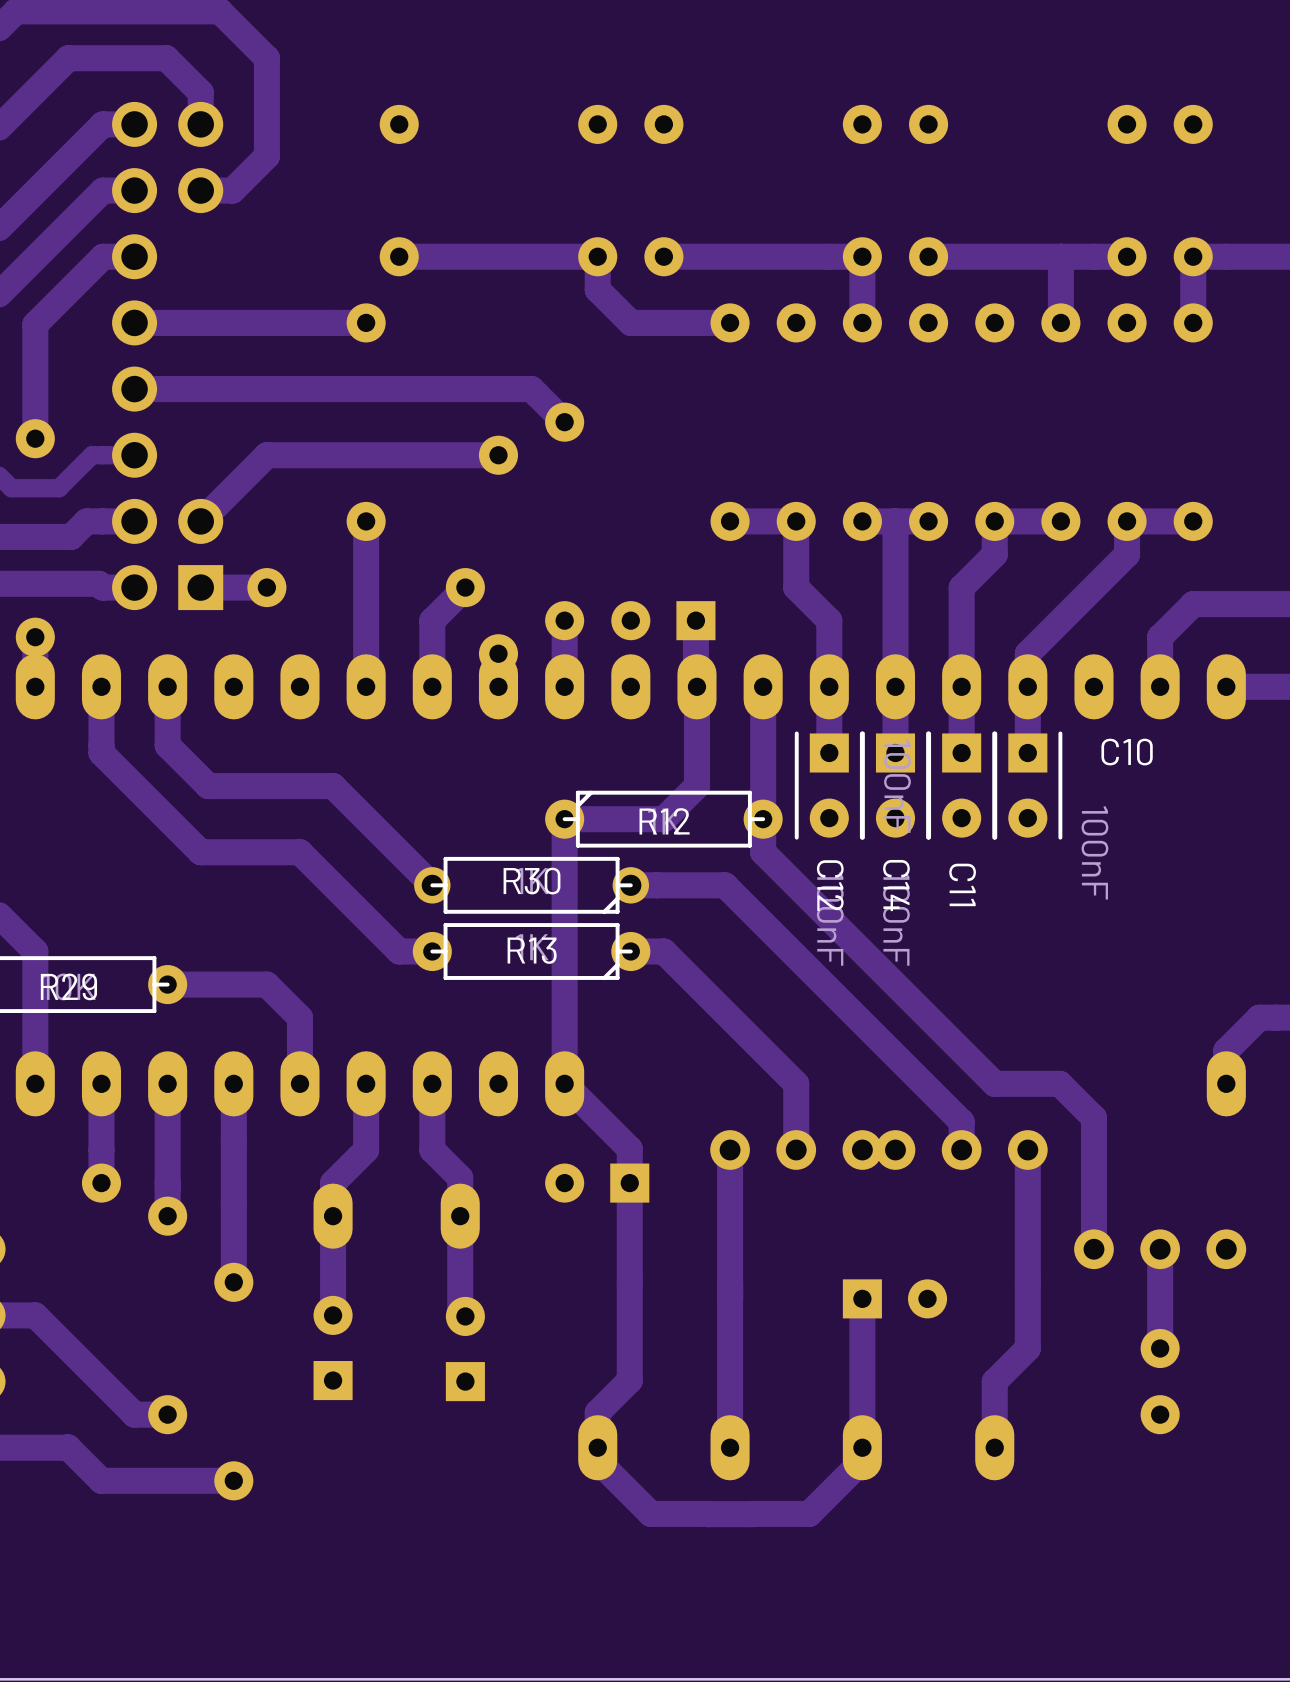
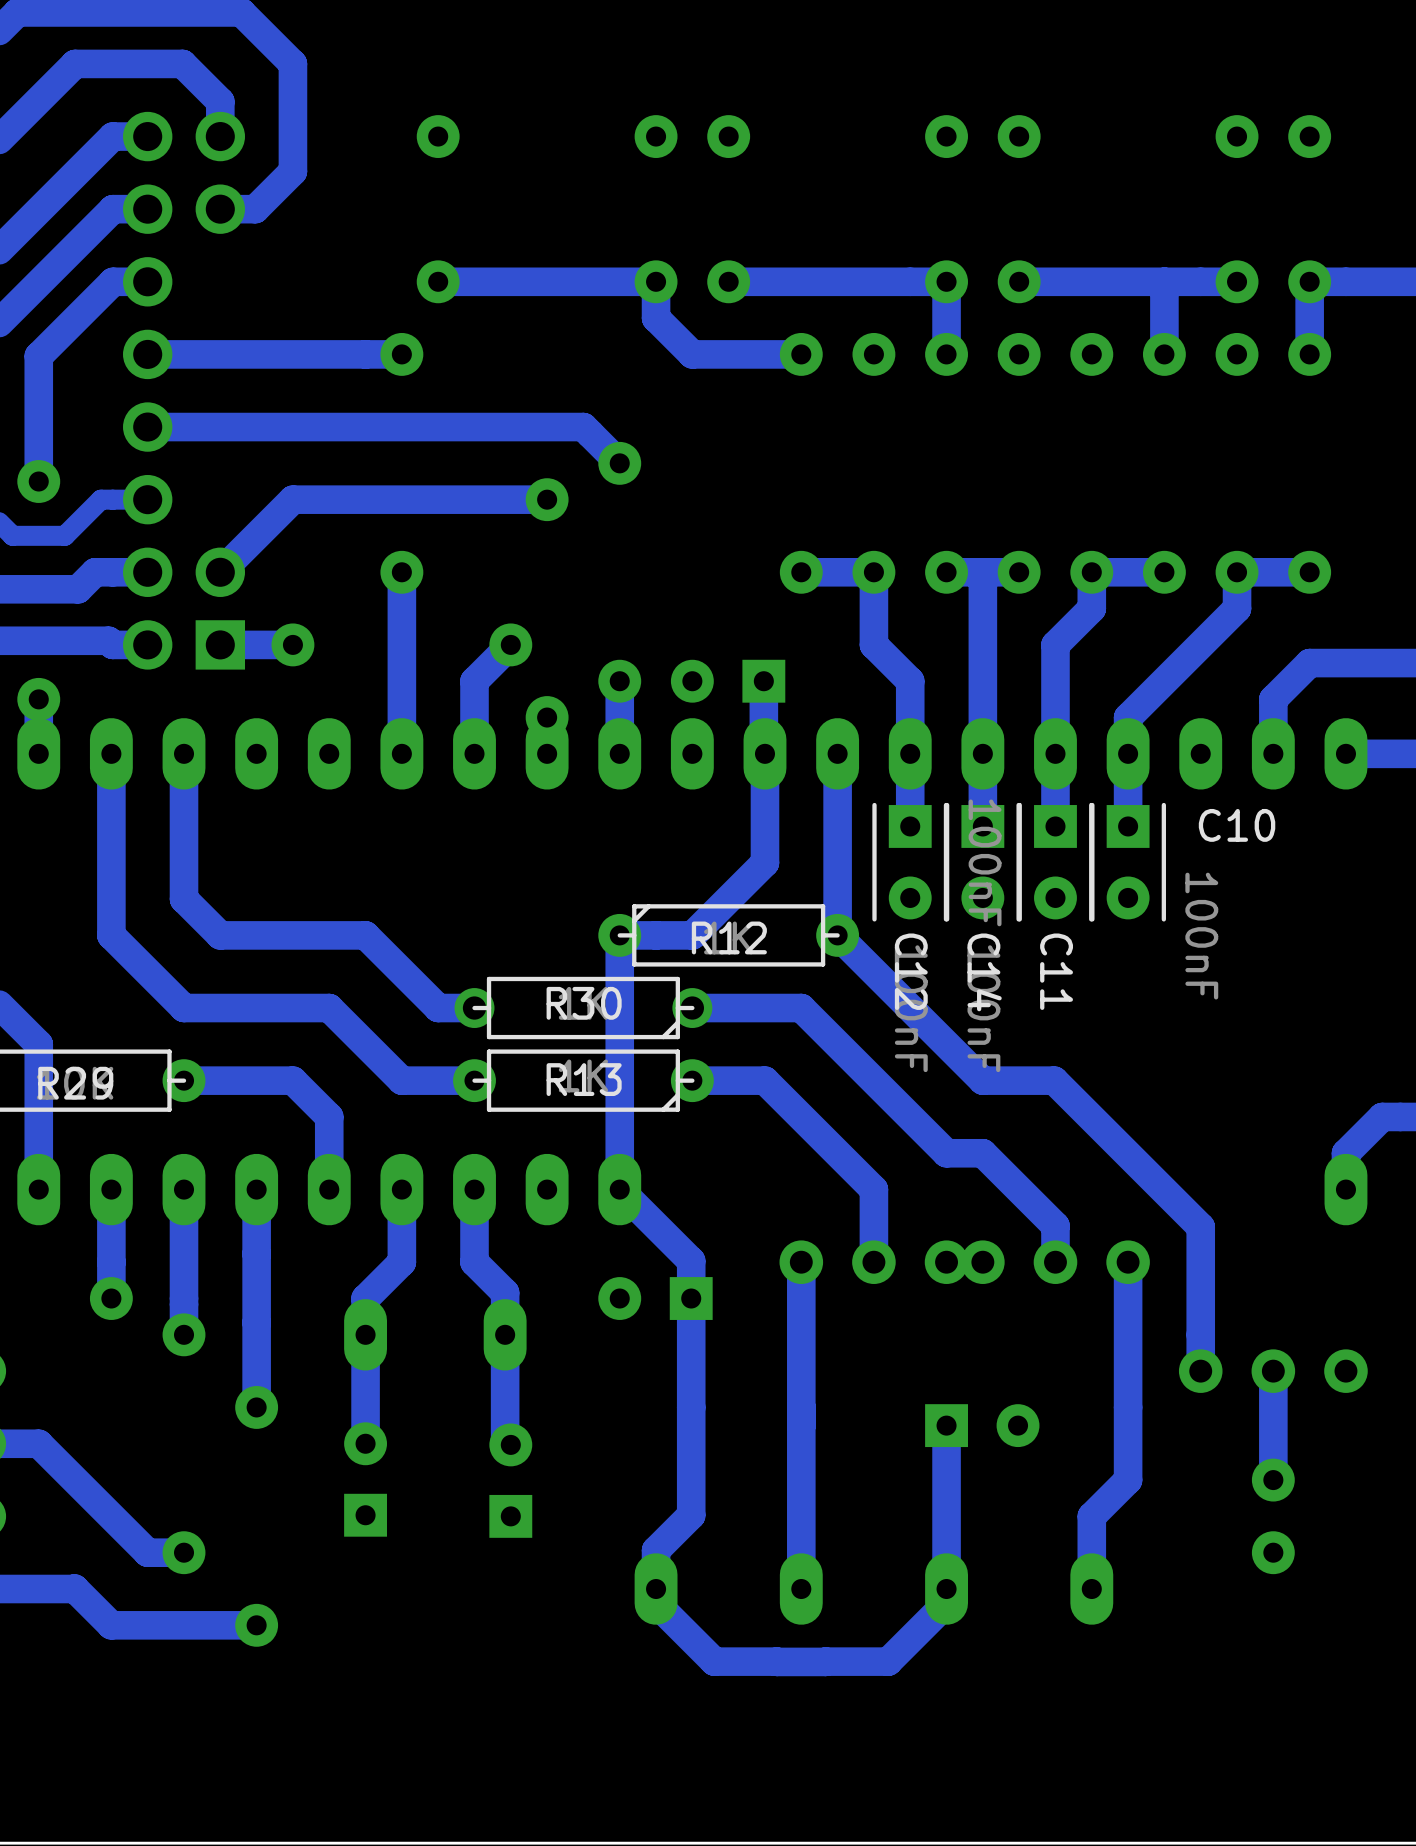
track: (167, 745) (208, 786) (333, 786) (432, 885) -> none
track: (101, 753) (167, 819) -> (184, 818) (184, 899)
track: none -> (111, 826) (111, 935) (184, 1008) (329, 1008) (401, 1080) (474, 1080)
track: (663, 819) (564, 819) (564, 852) -> (728, 899) (692, 935) (619, 935)
R12 position: (663, 819) -> (728, 935)
track: (299, 852) (399, 951) (432, 951) -> (329, 935) (365, 935) (438, 1008) (474, 1008)
R30 position: (531, 885) -> (583, 1008)
track: (630, 885) (725, 885) (961, 1121) -> (692, 1008) (801, 1008) (946, 1153) (982, 1153) (1055, 1225) (1055, 1231)
R13 position: (531, 951) -> (583, 1080)
track: (630, 951) (663, 951) (696, 984) -> (692, 1080) (764, 1080)
track: (895, 984) (994, 1083) (1059, 1083) -> (982, 1080) (1054, 1080) (1163, 1189)

